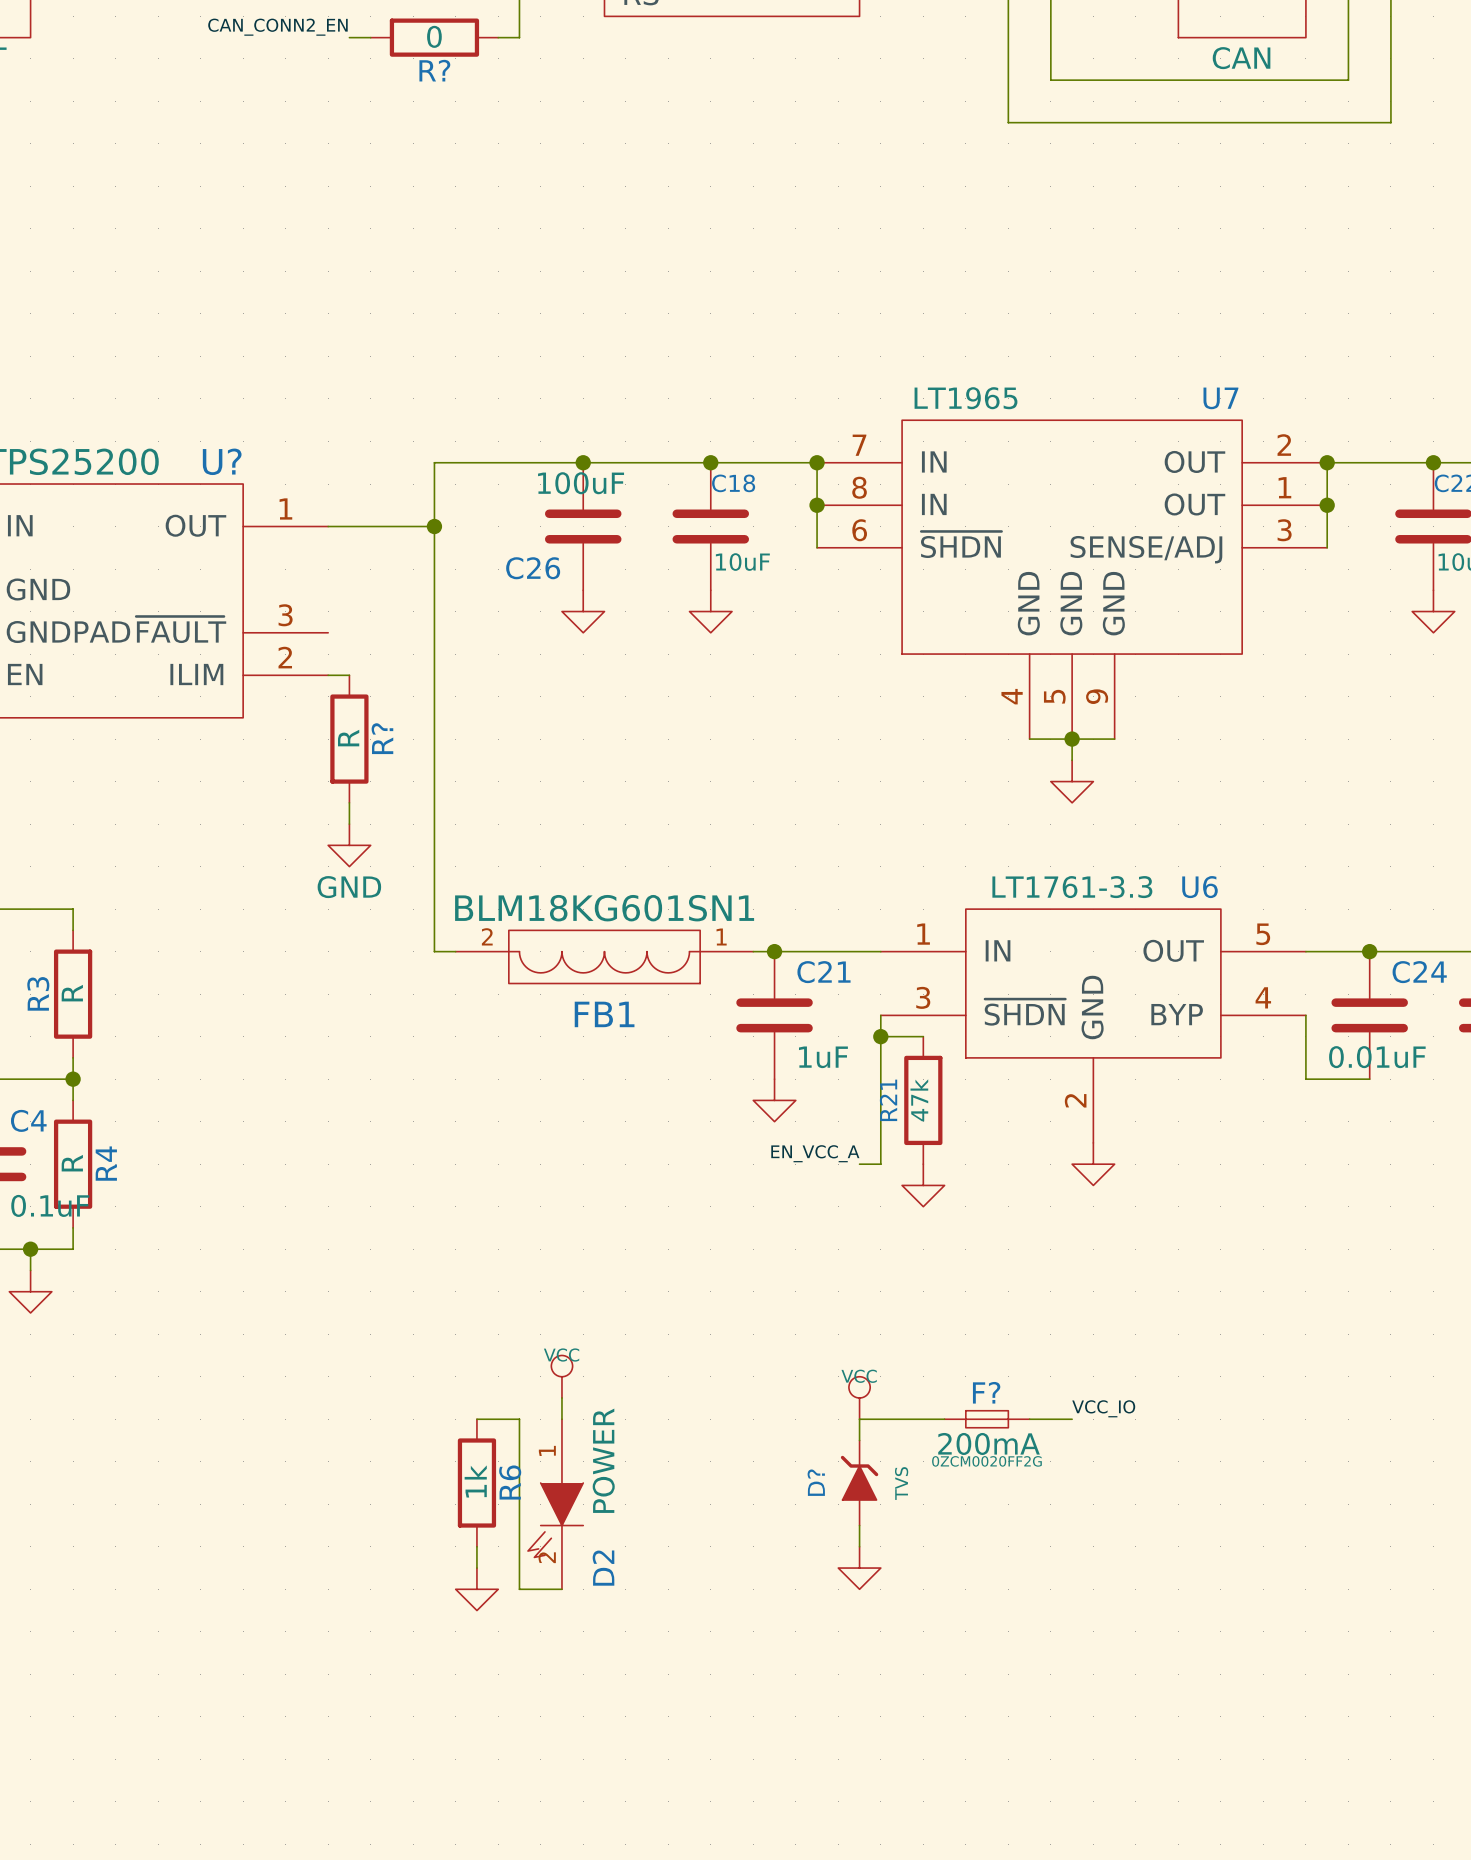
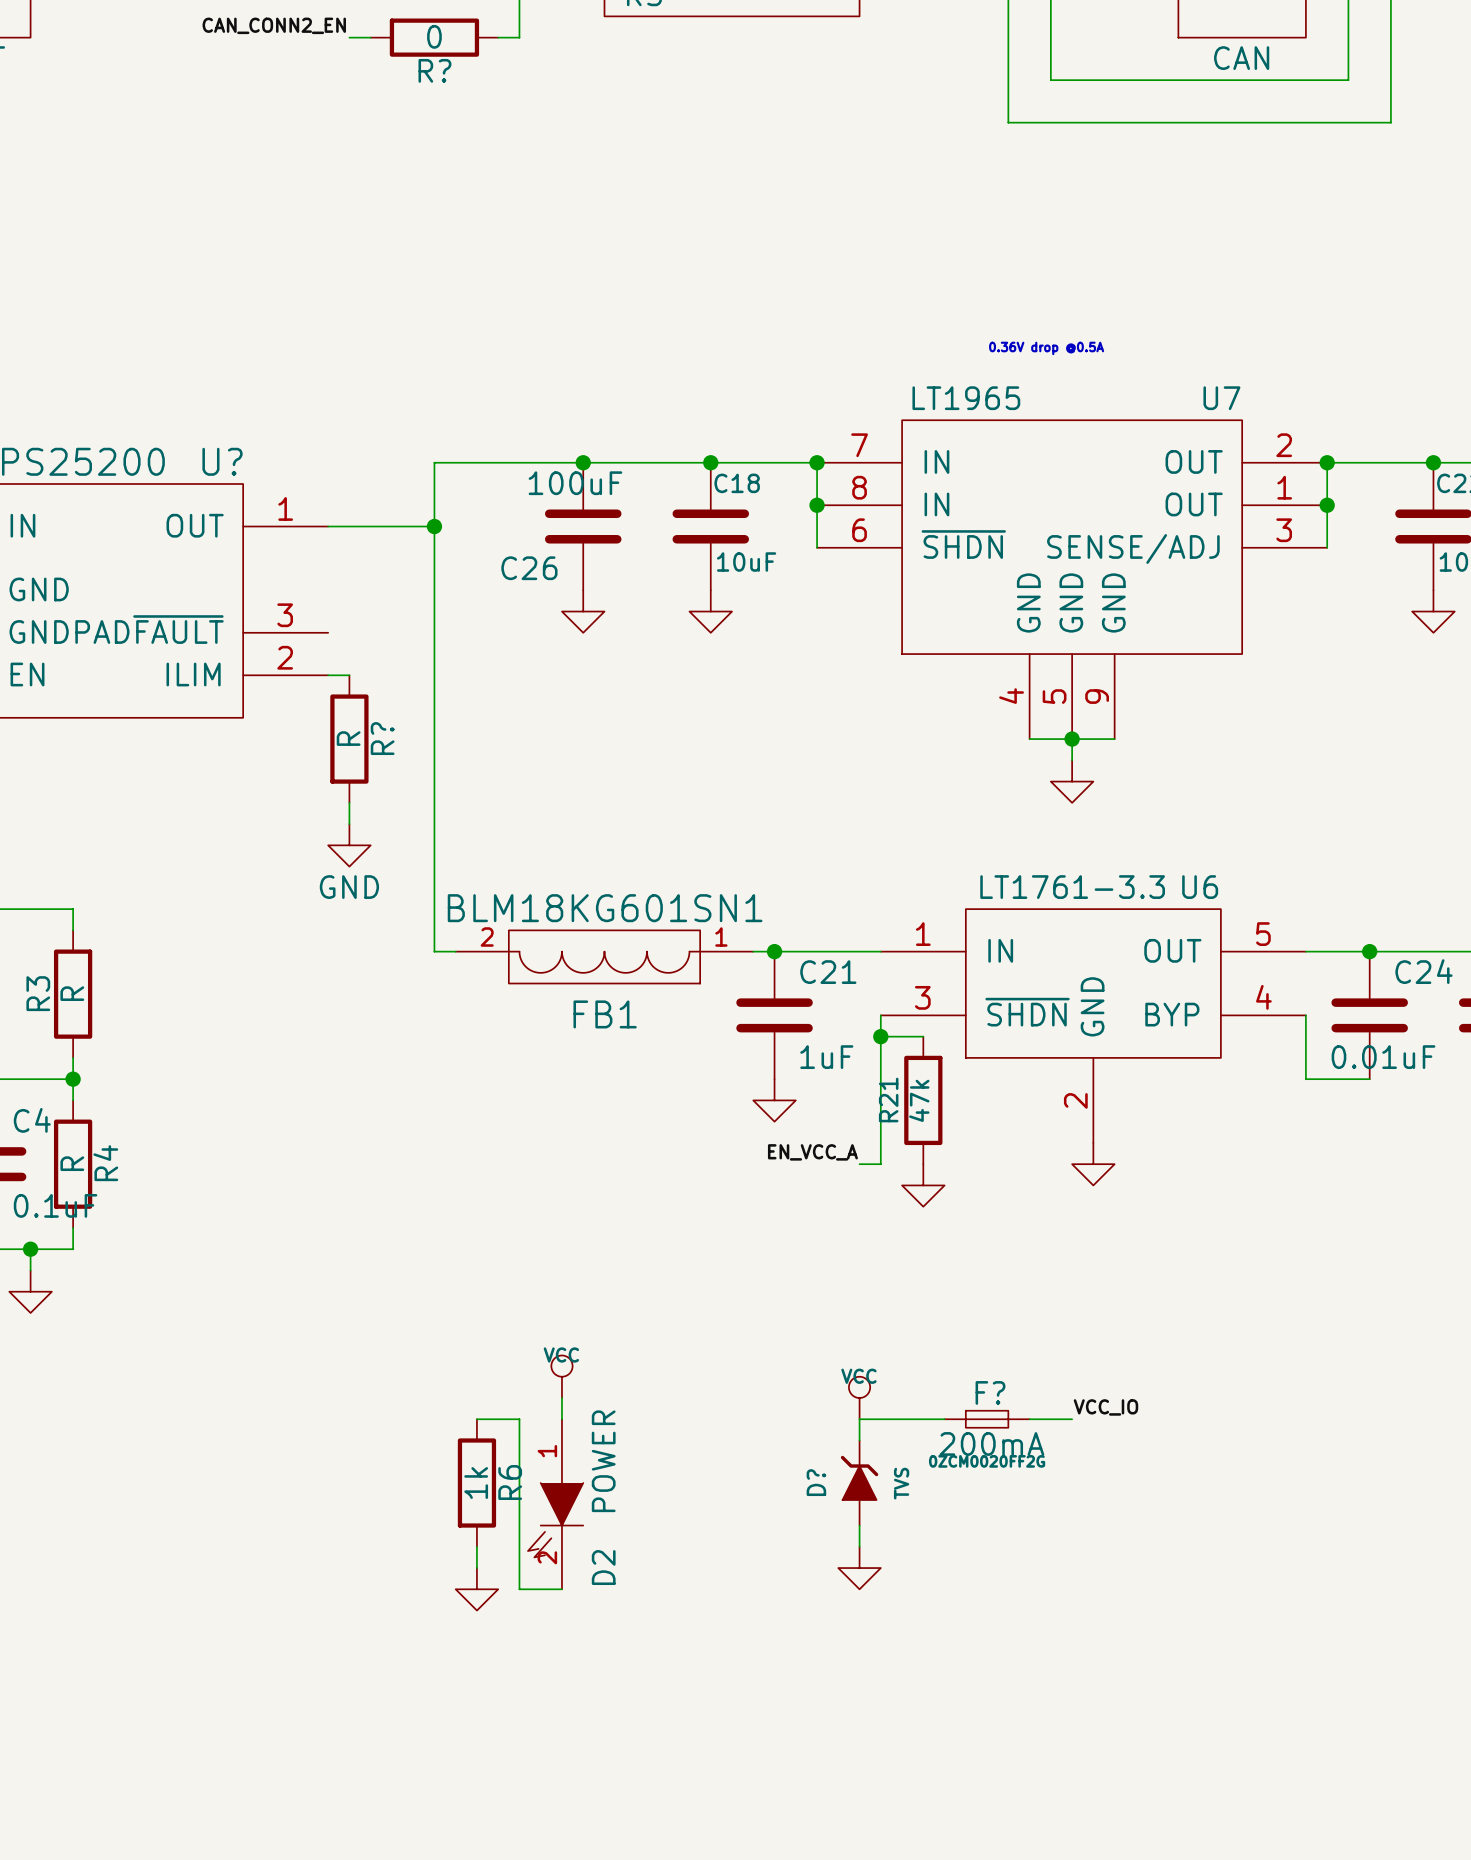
text: none -> 0.36V drop @0.5A (1046, 348)

